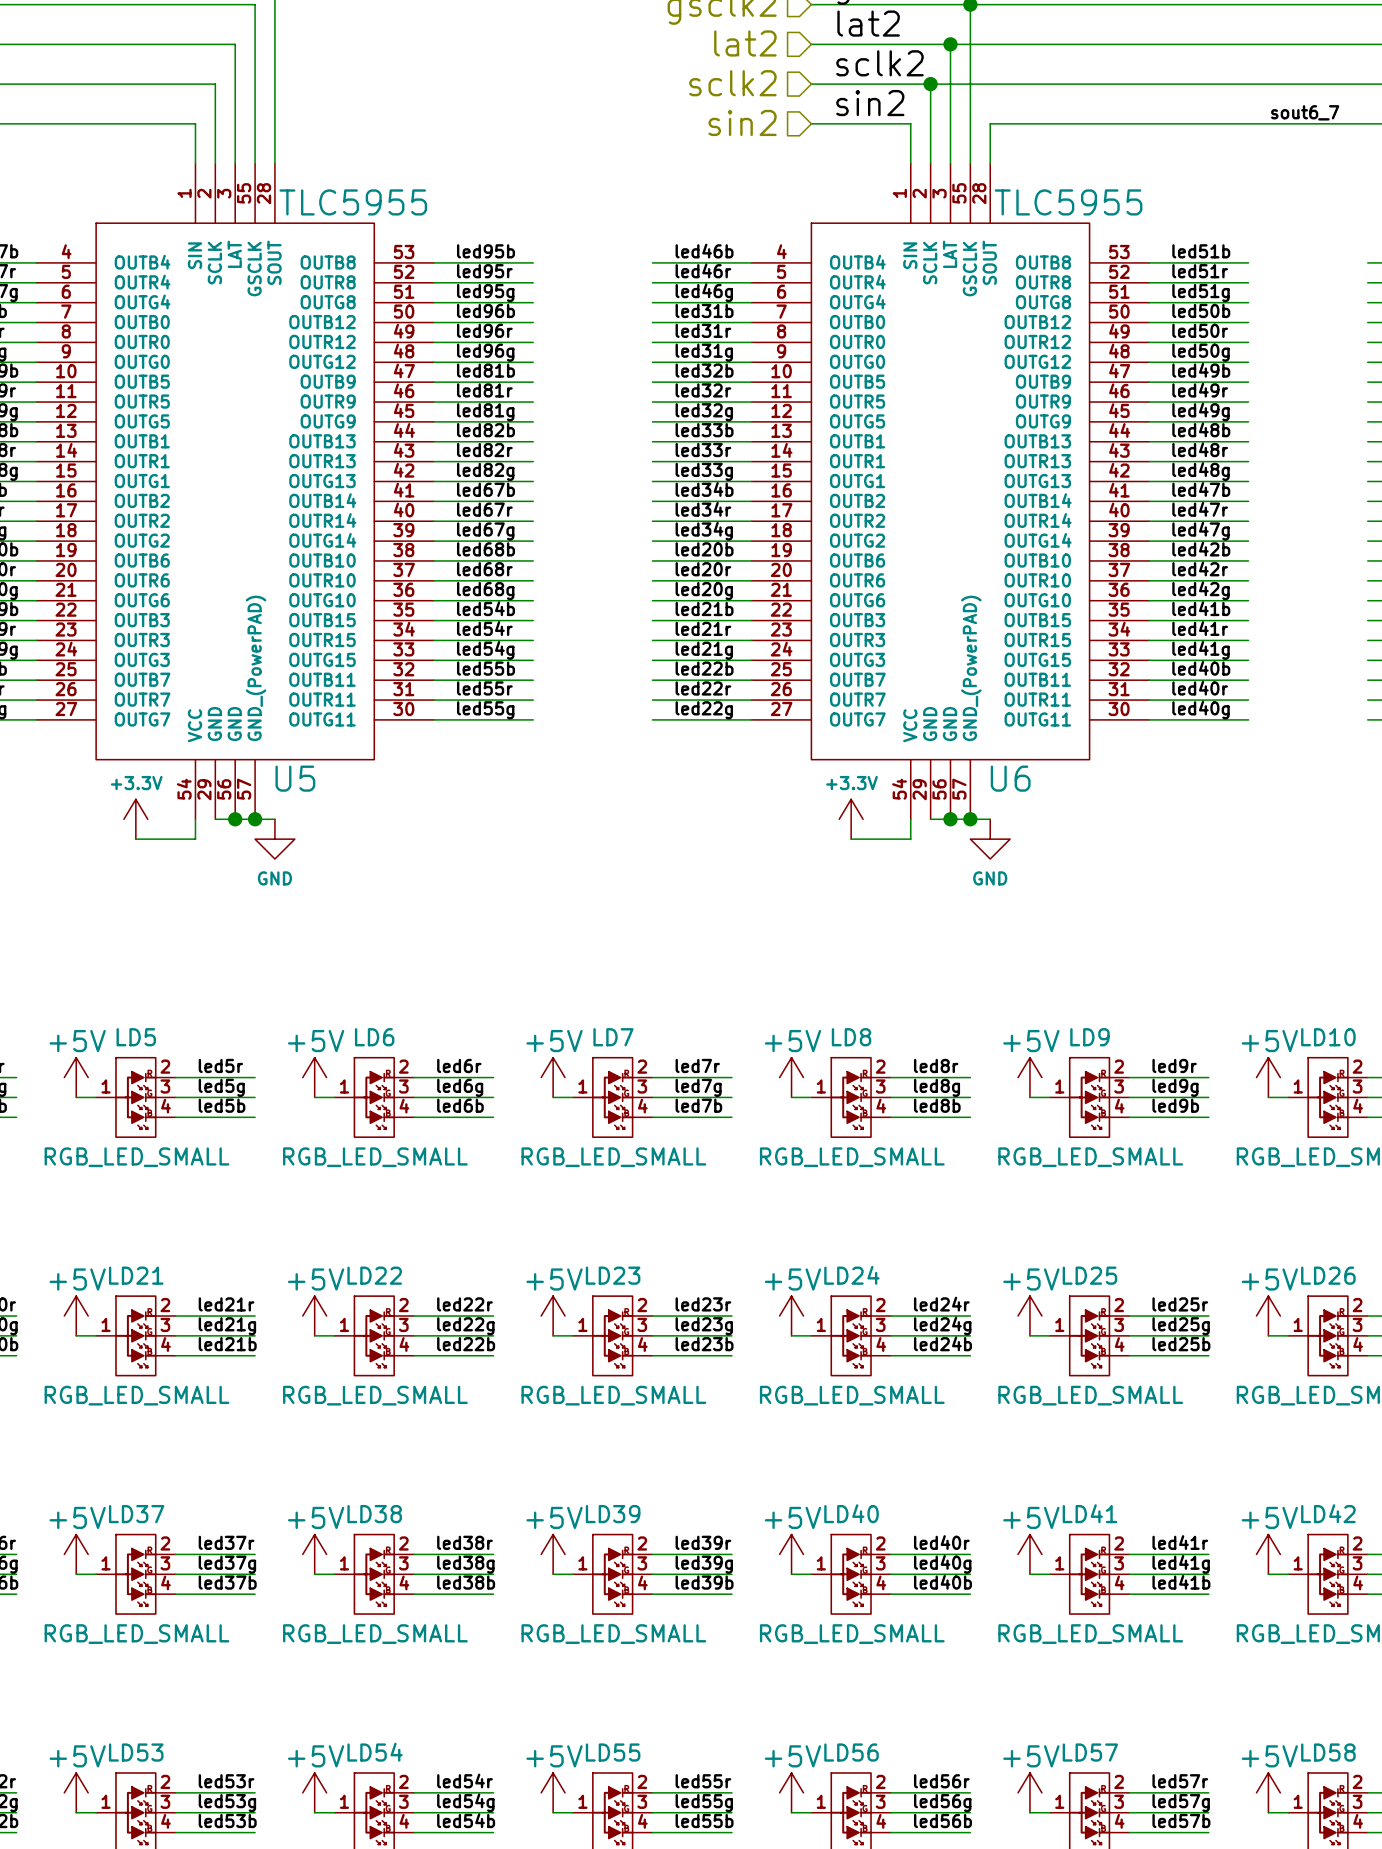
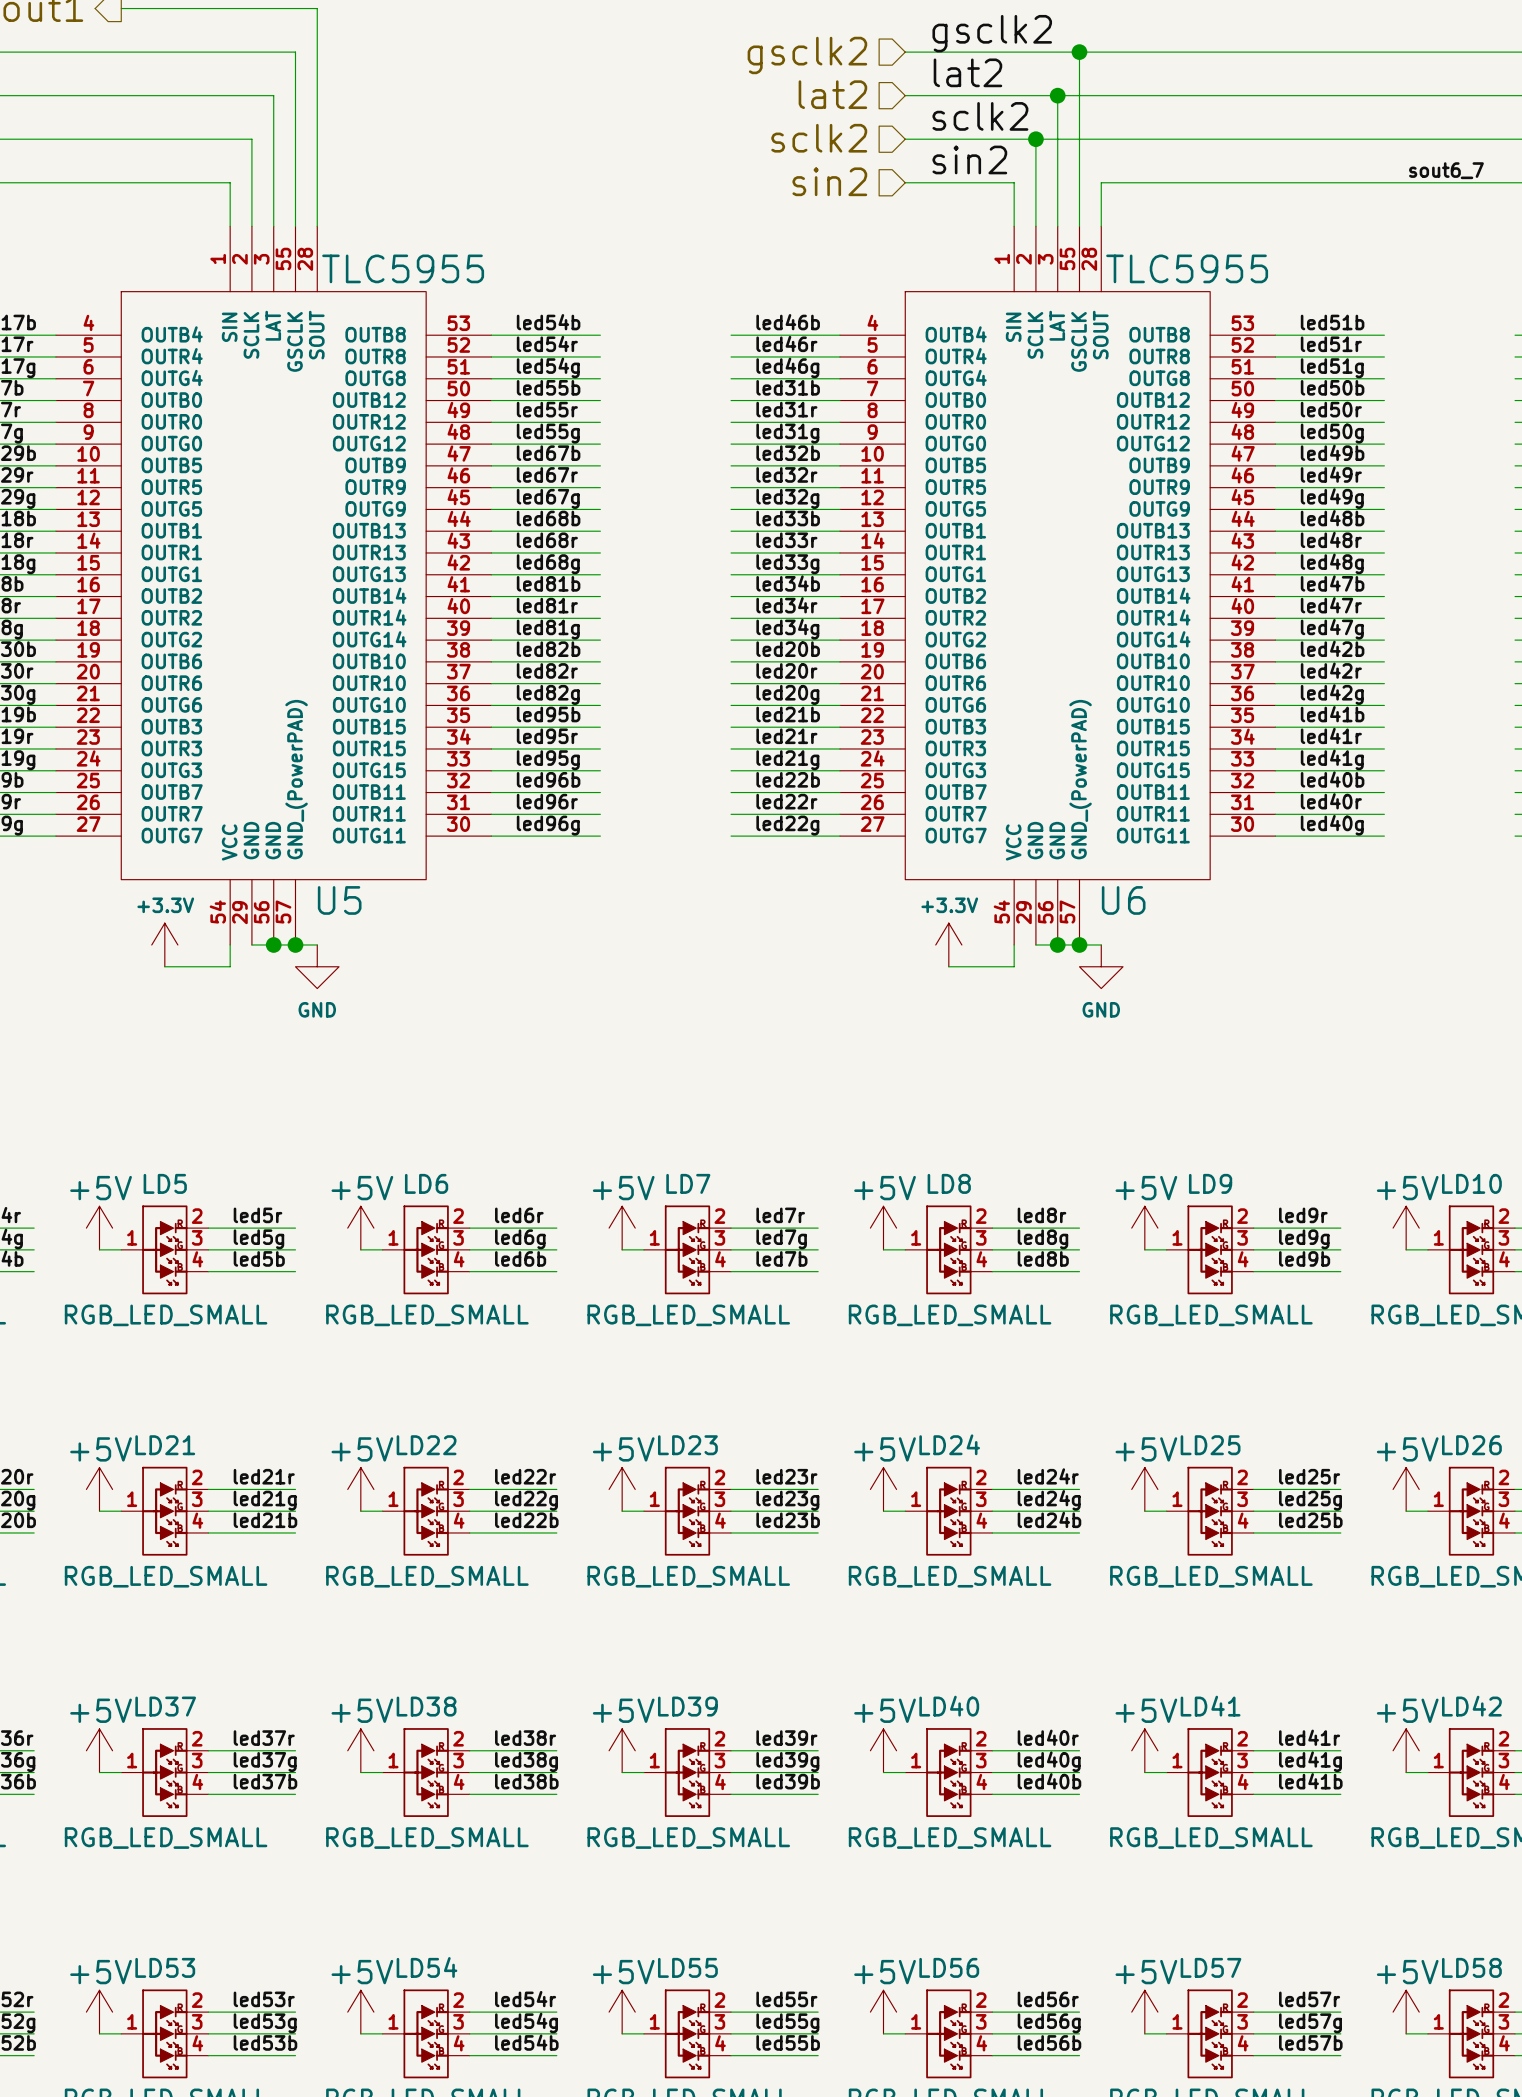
label: led95b (485, 251) -> led54b (548, 322)
label: led95r (484, 271) -> led54r (547, 343)
label: led95g (485, 293) -> led54g (548, 367)
label: led96b (485, 310) -> led55b (548, 387)
label: led96r (484, 330) -> led55r (547, 409)
label: led96g (485, 352) -> led55g (548, 433)
label: led81b (485, 370) -> led67b (548, 453)
label: led81r (484, 390) -> led67r (547, 474)
label: led81g (485, 412) -> led67g (548, 498)
label: led82b (485, 430) -> led68b (548, 518)
label: led82r (484, 450) -> led68r (547, 540)
label: led82g (485, 471) -> led68g (548, 564)
label: led67b (485, 489) -> led81b (548, 583)
label: led67r (484, 509) -> led81r (547, 605)
label: led67g (485, 531) -> led81g (548, 629)
label: led68b (485, 549) -> led82b (548, 649)
label: led68r (484, 569) -> led82r (547, 670)
label: led68g (485, 591) -> led82g (548, 694)
label: led54b (485, 608) -> led95b (548, 714)
label: led54r (484, 628) -> led95r (547, 736)
label: led54g (485, 650) -> led95g (548, 760)
label: led55b (485, 668) -> led96b (548, 779)
label: led55r (484, 688) -> led96r (547, 801)
label: led55g (485, 710) -> led96g (548, 825)

